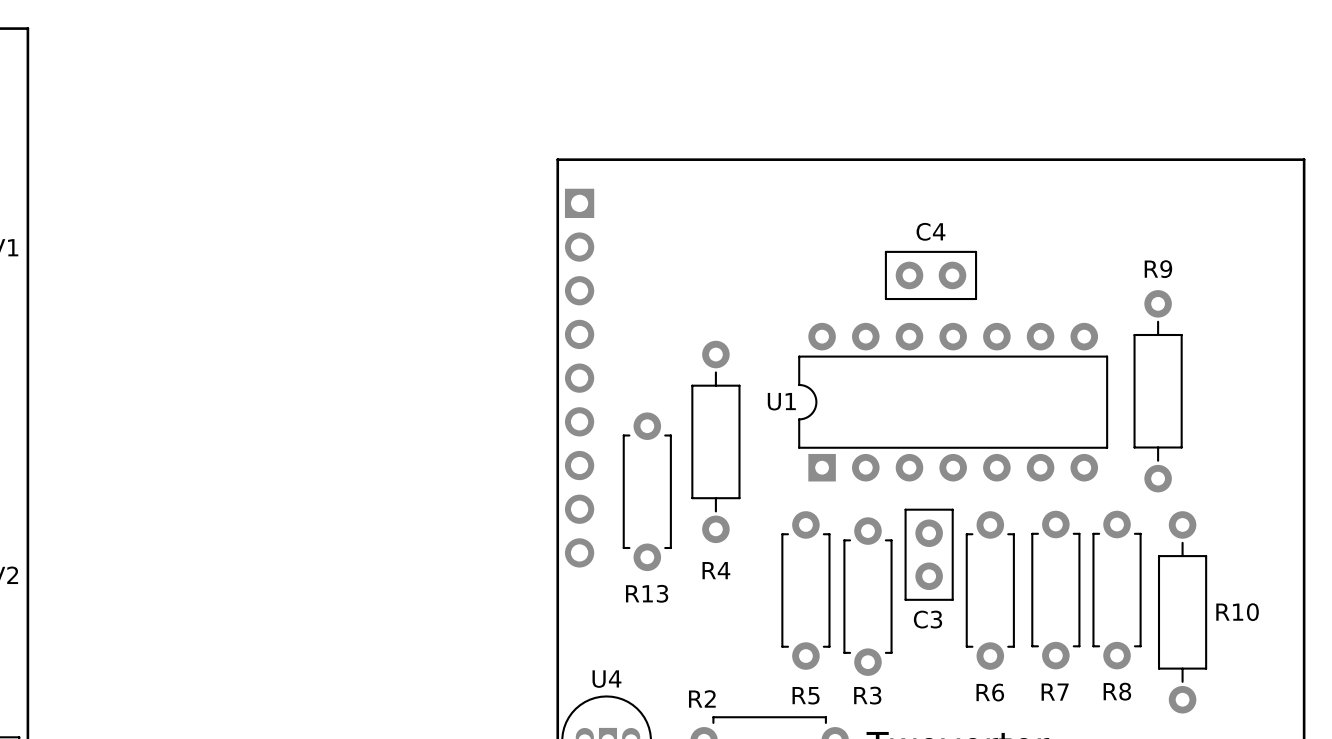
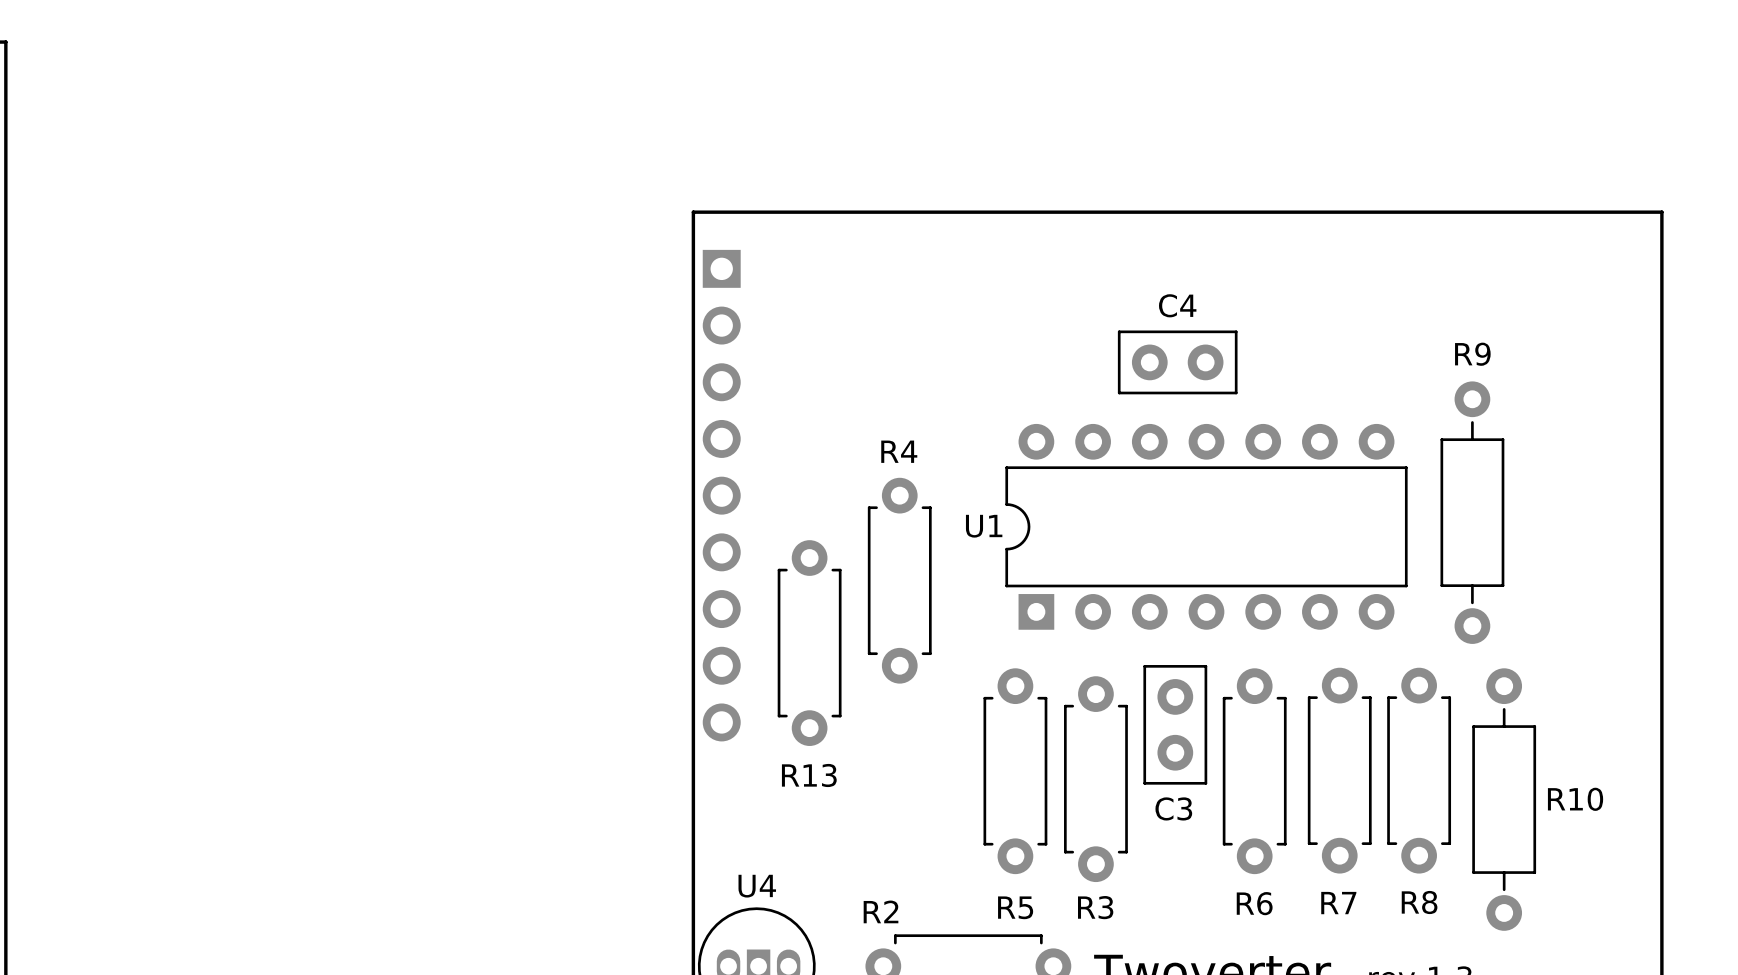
R4 footprint: [691, 340, 741, 544] -> [867, 477, 932, 684]
R4 name position: R4 (716, 570) -> R4 (899, 451)

